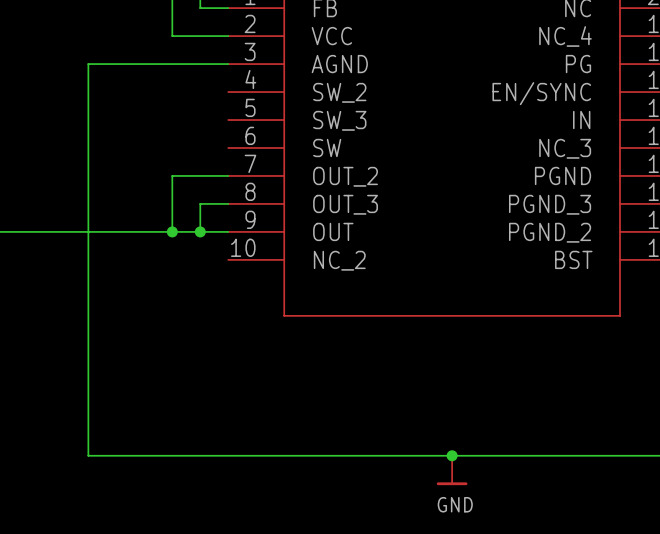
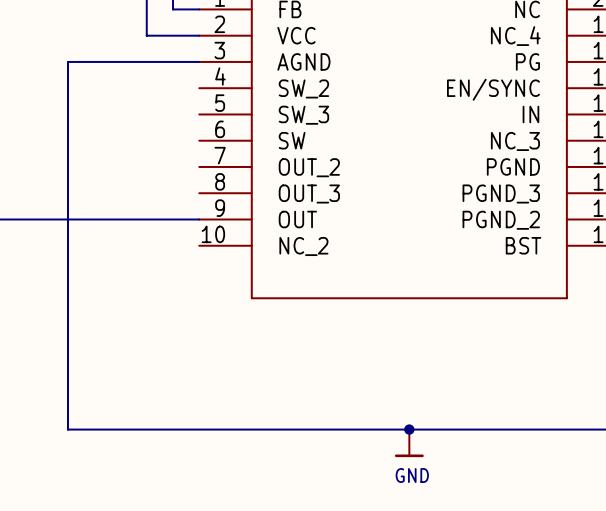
wire: (228, 175) (172, 175) (172, 231) -> none
wire: (228, 203) (200, 203) (200, 231) -> none
junction: (172, 231) -> none
junction: (200, 231) -> none

